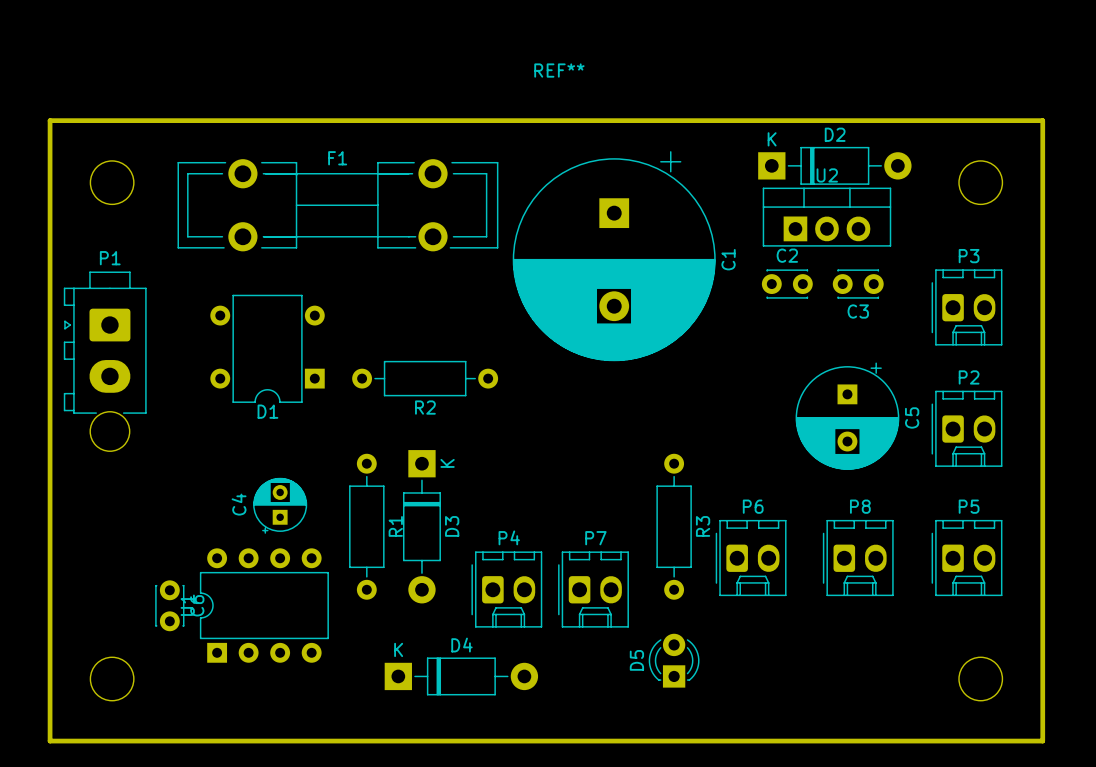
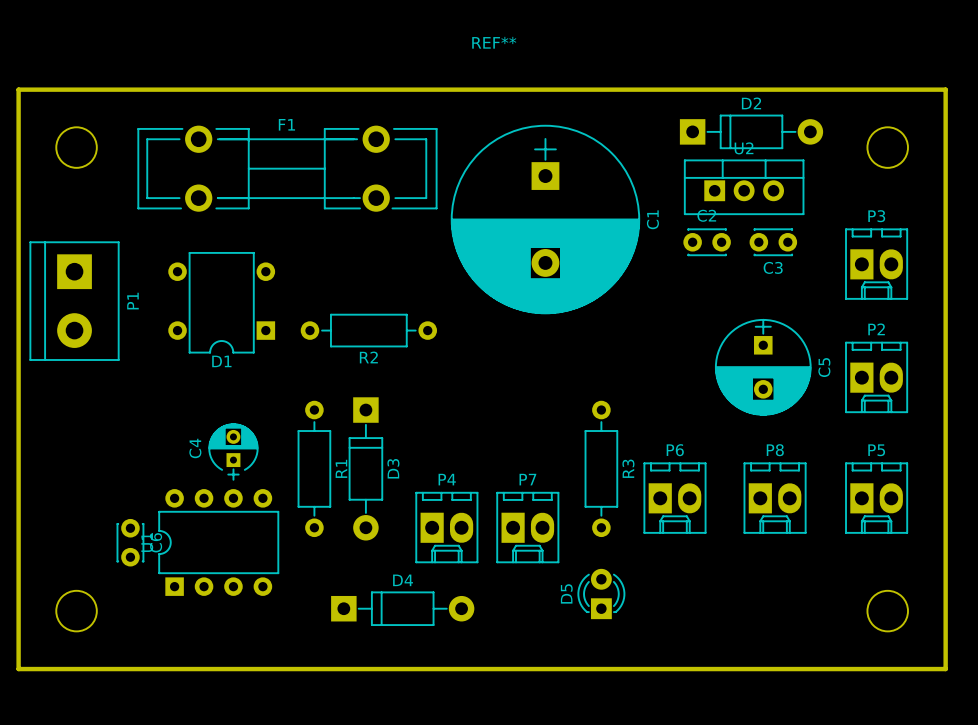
D2 footprint: [758, 146, 912, 185] -> [679, 114, 824, 149]
C1 footprint: [512, 151, 716, 362] -> [451, 125, 640, 314]
U2 footprint: [762, 187, 892, 247] -> [684, 159, 805, 215]
P1 name position: P1 (110, 258) -> P1 (132, 301)
P3 footprint: [931, 269, 1003, 346] -> [845, 228, 908, 300]
P1 footprint: [63, 271, 147, 452] -> [29, 241, 120, 361]
C5 footprint: [795, 362, 900, 470] -> [715, 319, 812, 416]
P2 footprint: [931, 390, 1003, 467] -> [845, 341, 908, 413]
D3 footprint: [402, 450, 441, 604] -> [348, 397, 383, 541]
C4 footprint: [253, 477, 308, 534] -> [208, 423, 259, 481]
P6 footprint: [715, 519, 787, 597] -> [643, 462, 707, 534]
P8 footprint: [822, 519, 894, 597] -> [743, 462, 807, 534]
P5 footprint: [931, 519, 1003, 597] -> [845, 462, 908, 534]
P4 footprint: [471, 551, 543, 628] -> [415, 492, 479, 564]
P7 footprint: [558, 551, 629, 628] -> [496, 492, 560, 564]
D4 footprint: [384, 657, 539, 696] -> [331, 591, 475, 626]

